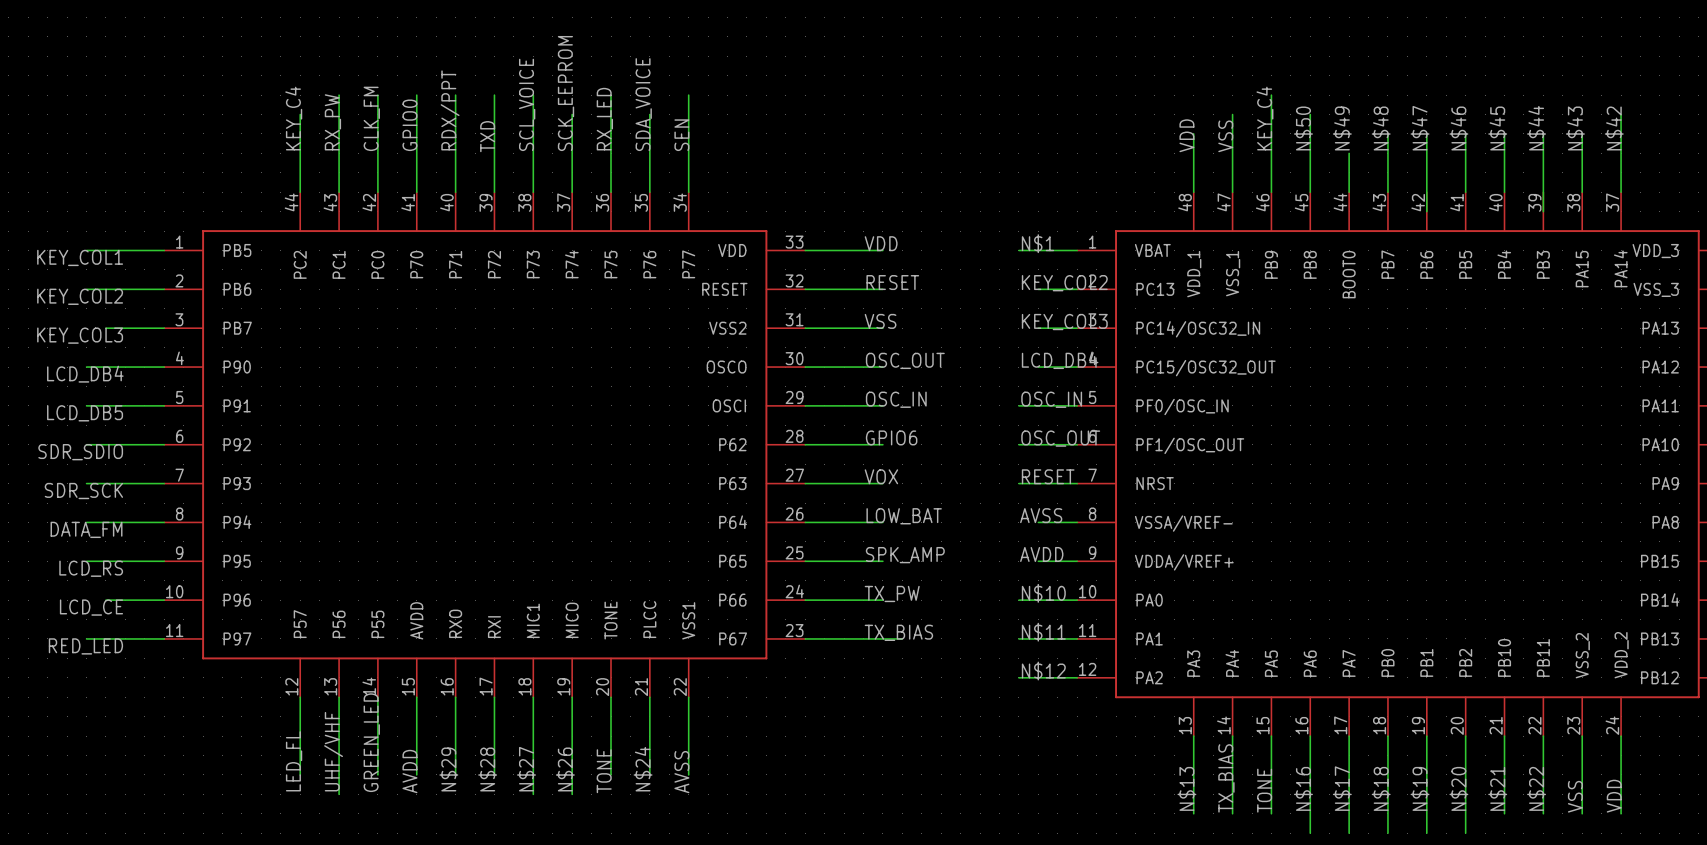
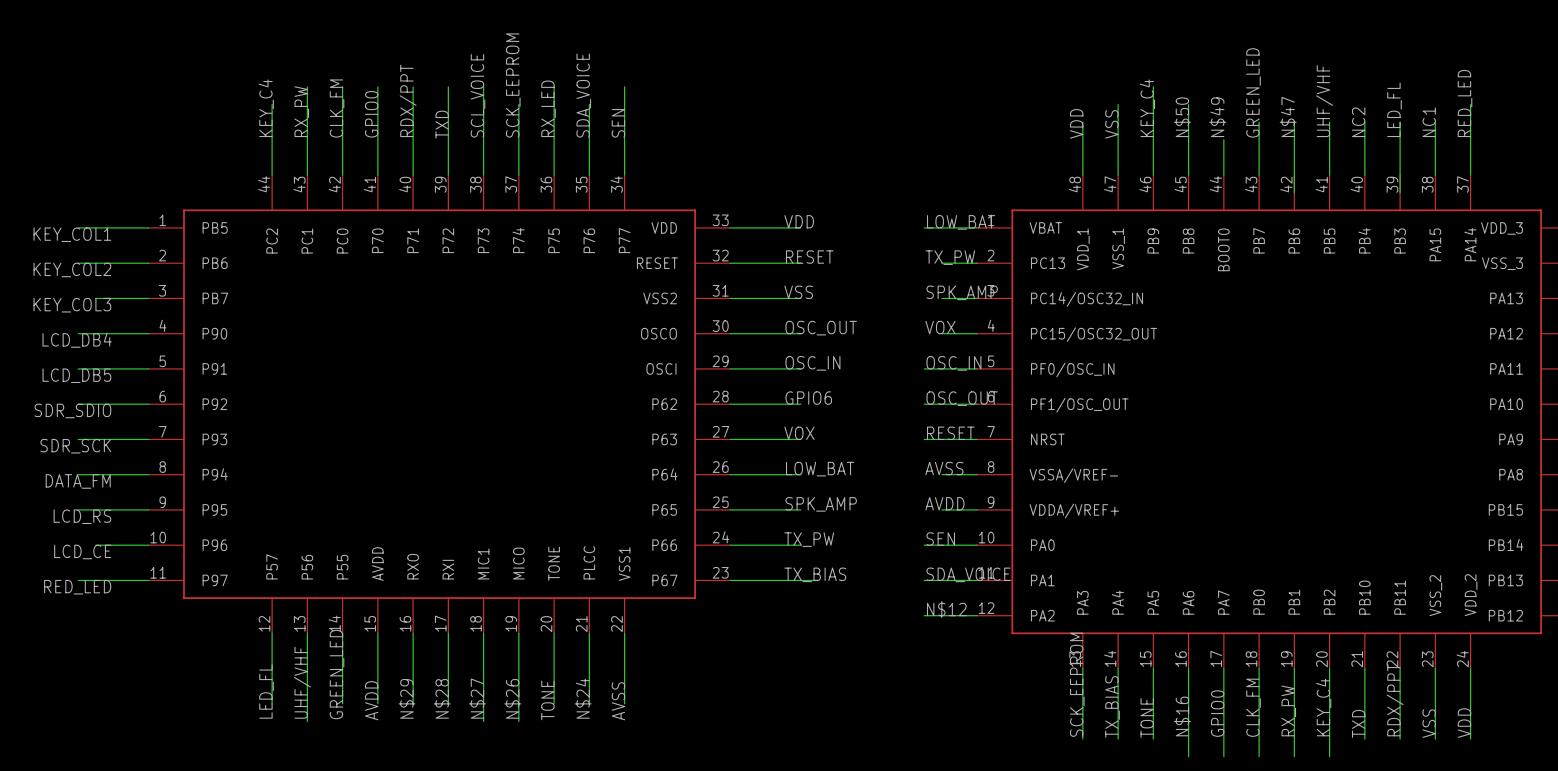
label: N$48 (1381, 128) -> GREEN_LED (1253, 92)
label: N$46 (1458, 128) -> UHF/VHF (1324, 101)
label: N$45 (1497, 128) -> NC2 (1358, 122)
label: N$44 (1536, 128) -> LED_FL (1394, 109)
label: N$43 (1575, 128) -> NC1 (1429, 122)
label: N$42 (1614, 128) -> RED_LED (1465, 103)
label: N$1 (1037, 243) -> LOW_BAT (961, 222)
label: KEY_COL2 (1064, 283) -> TX_PW (950, 257)
label: KEY_COL3 (1064, 322) -> SPK_AMP (962, 292)
label: LCD_DB4 (1060, 360) -> VOX (940, 327)
label: N$10 (1043, 593) -> SEN (940, 539)
label: N$11 (1043, 632) -> SDA_VOICE (968, 574)
label: N$13 (1186, 788) -> SCK_EEPROM (1077, 684)
label: N$17 (1342, 788) -> GPIO0 (1217, 713)
label: N$18 (1381, 788) -> CLK_FM (1253, 707)
label: N$19 (1420, 788) -> RX_PW (1288, 710)
label: N$20 (1458, 788) -> KEY_C4 (1323, 707)
label: N$21 (1497, 788) -> TXD (1358, 723)
label: N$22 (1536, 788) -> RDX/PPT (1395, 700)

